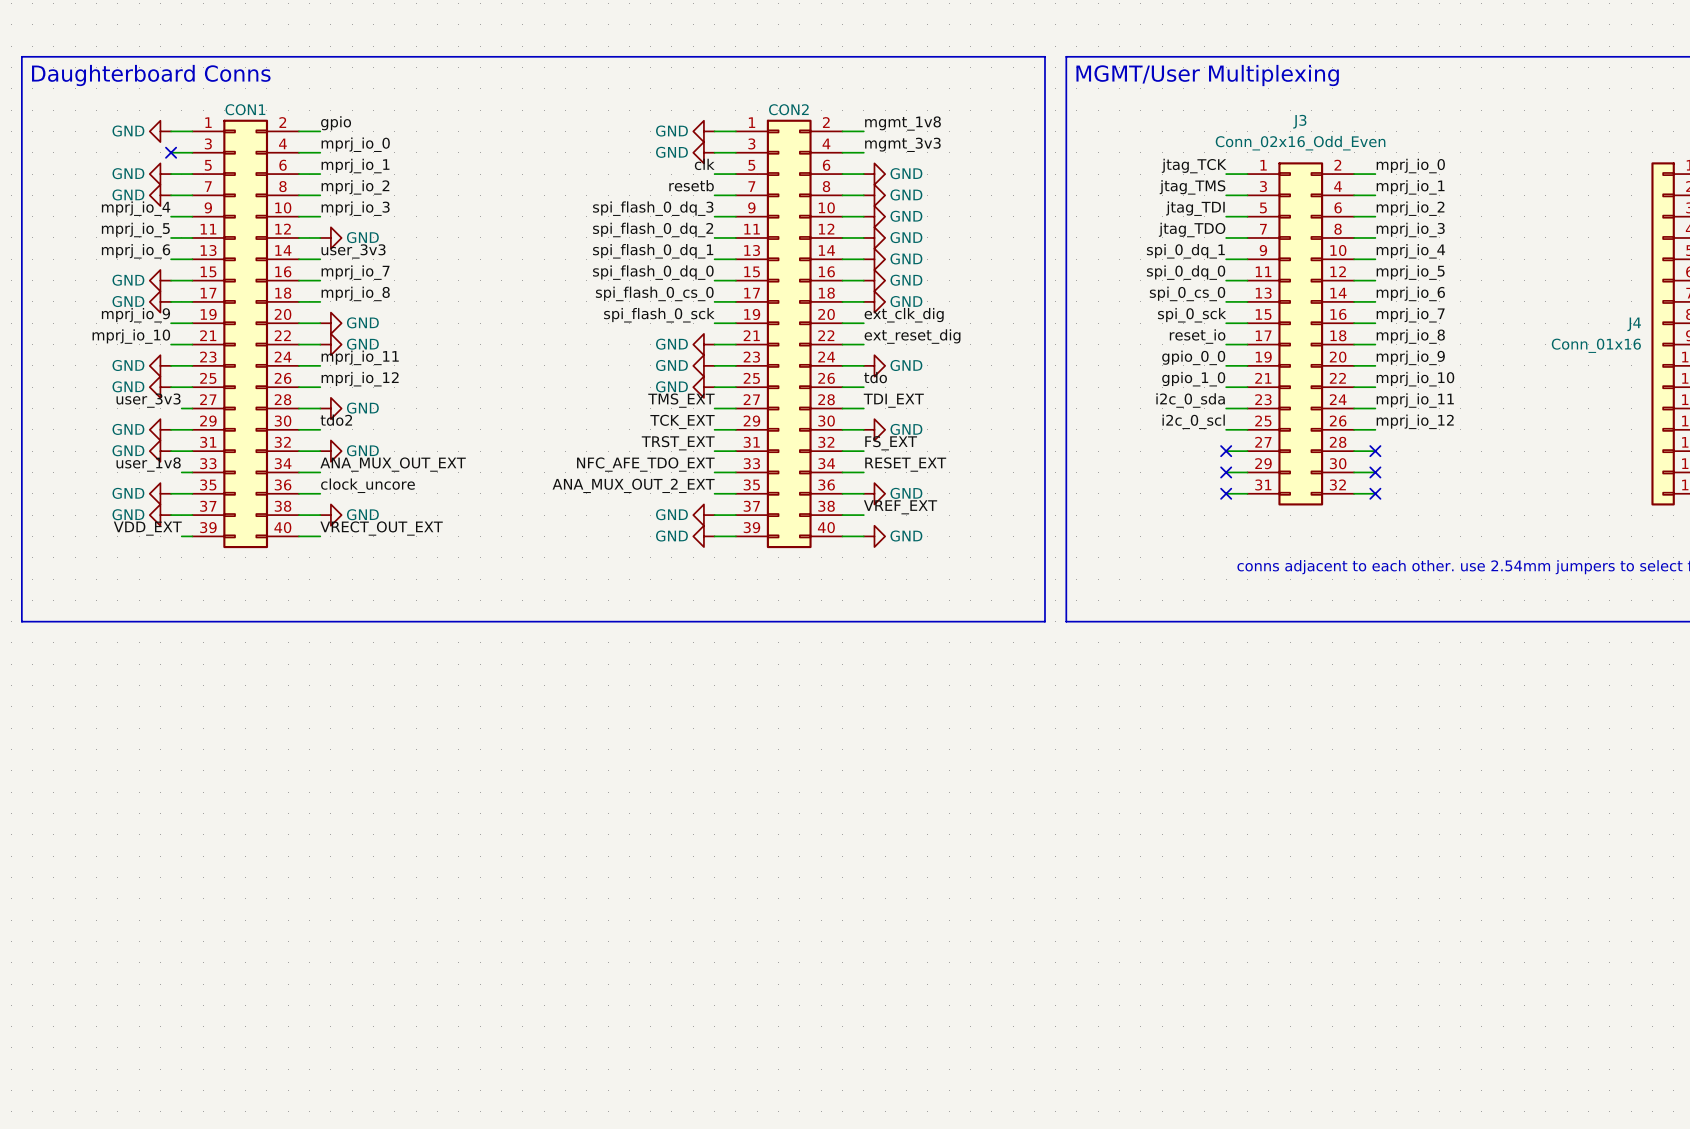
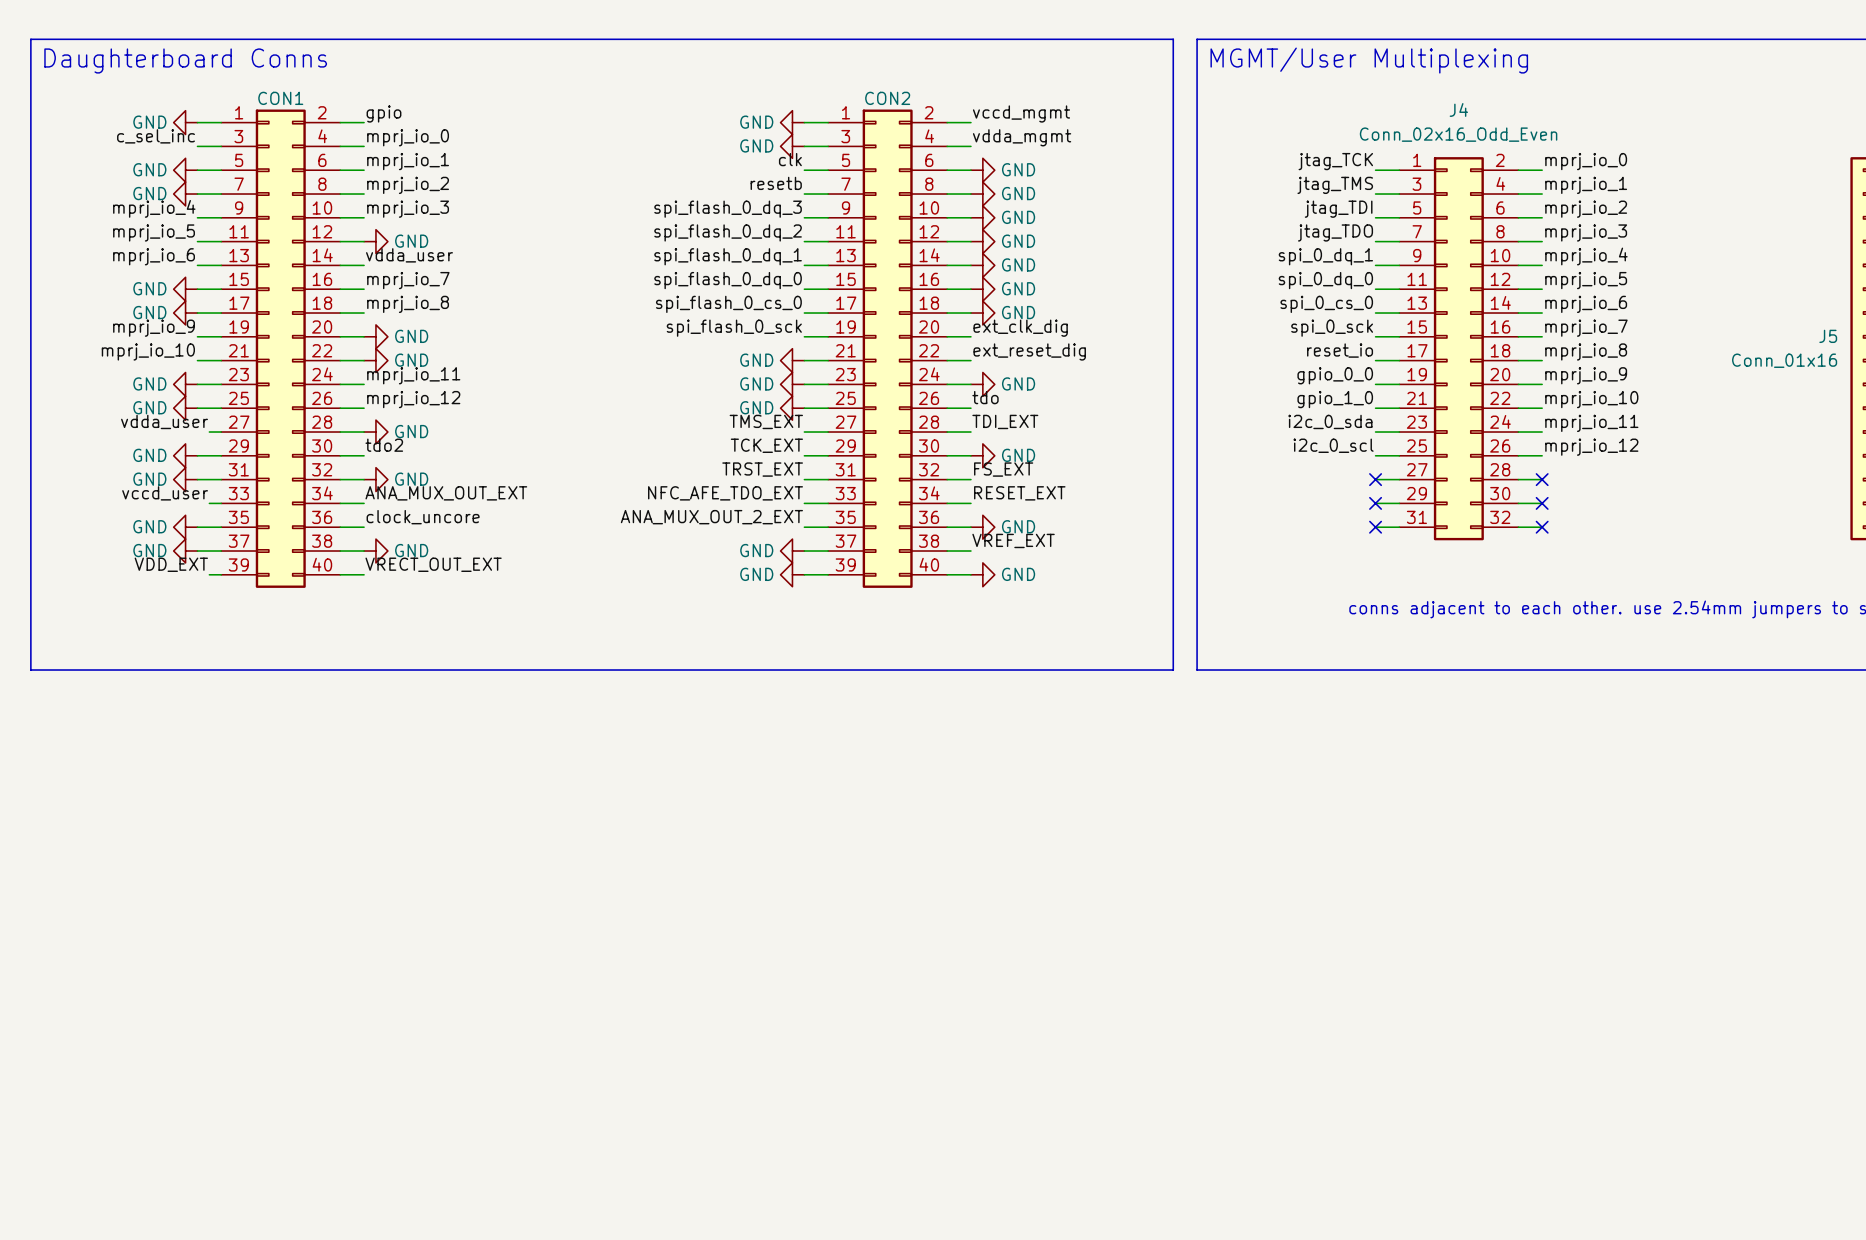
J3 name: J3 (1299, 121) -> J4 (1458, 109)
label: mgmt_1v8 (903, 123) -> vccd_mgmt (1021, 113)
label: none -> c_sel_inc (156, 136)
label: mgmt_3v3 (902, 144) -> vdda_mgmt (1022, 137)
no-connect mark: (171, 152) -> none
label: user_3v3 (353, 251) -> vdda_user (409, 255)
J4 name: J4 (1634, 324) -> J5 (1828, 336)
label: user_3v3 (148, 400) -> vdda_user (164, 421)
label: user_1v8 (148, 464) -> vccd_user (165, 493)

